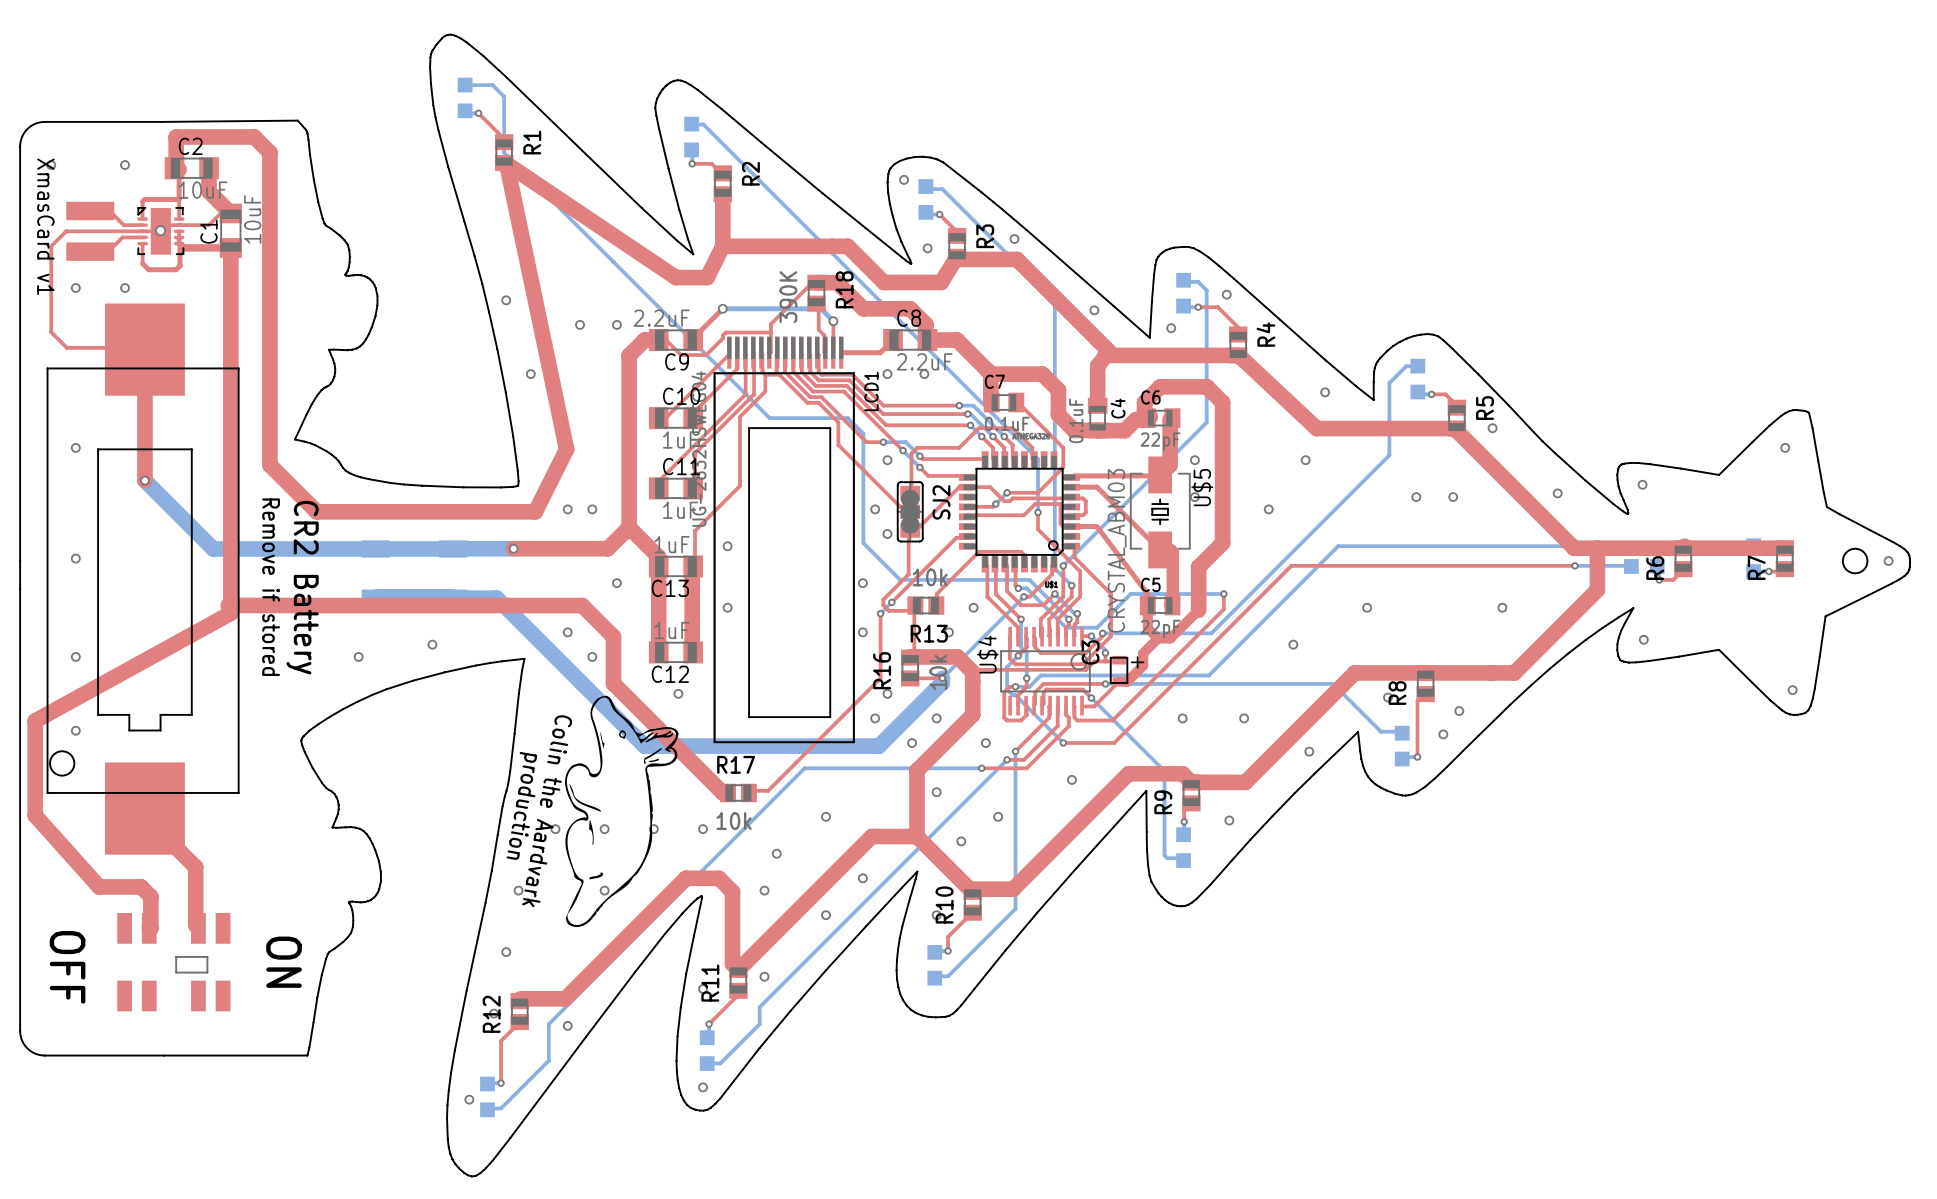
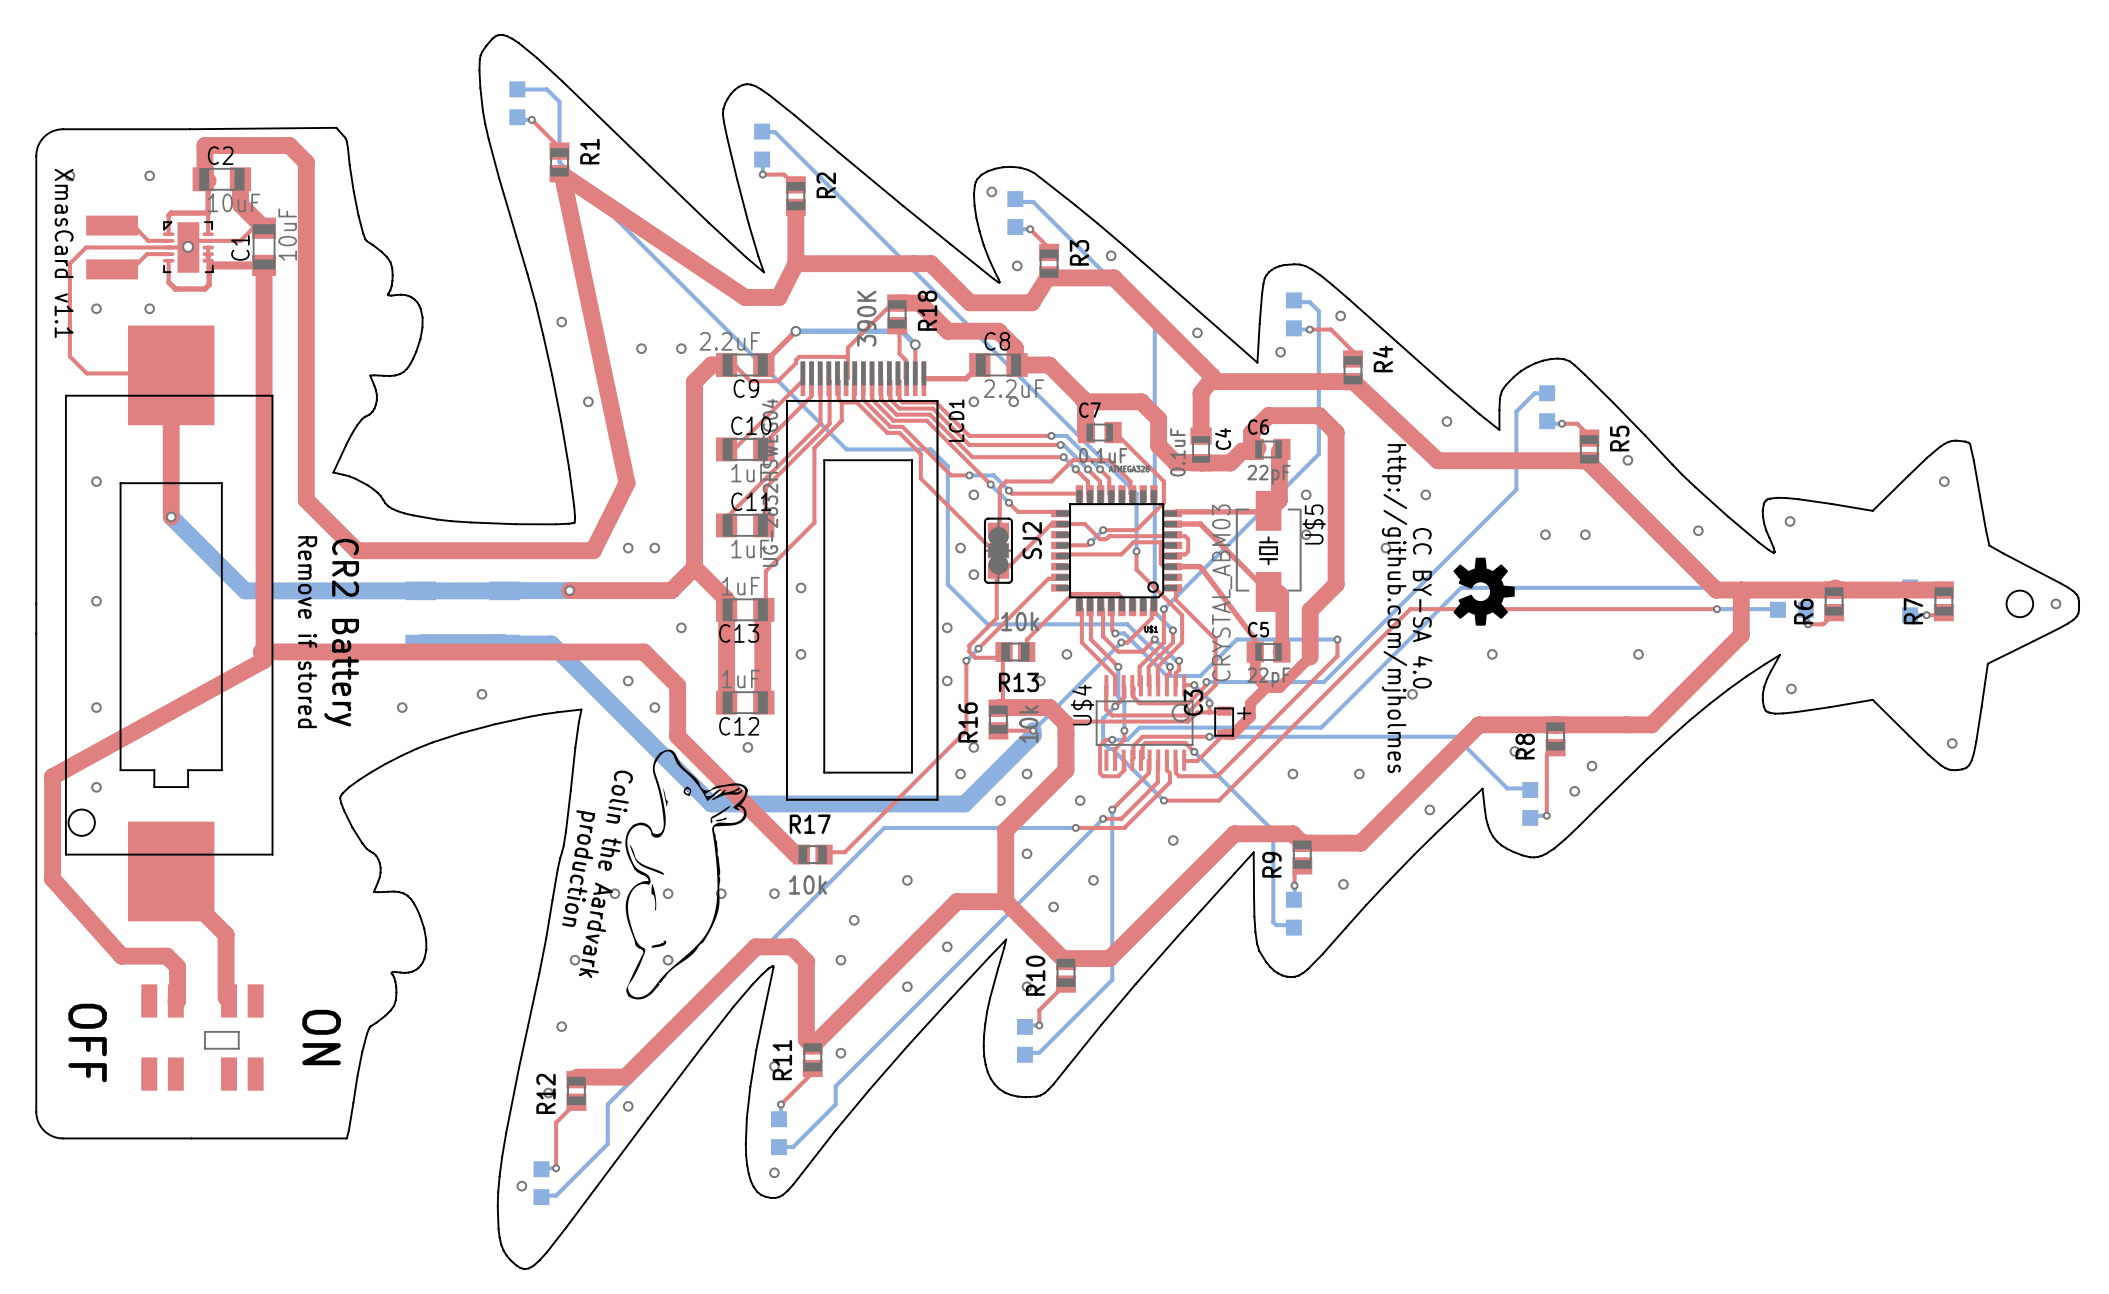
text: XmasCard v1 (45, 226) -> XmasCard v1.1 (64, 253)
drawing: none -> [1453, 557, 1515, 626]
text: none -> http://github.com/mjholmes (1394, 608)
text: none -> CC BY-SA 4.0 (1422, 608)

